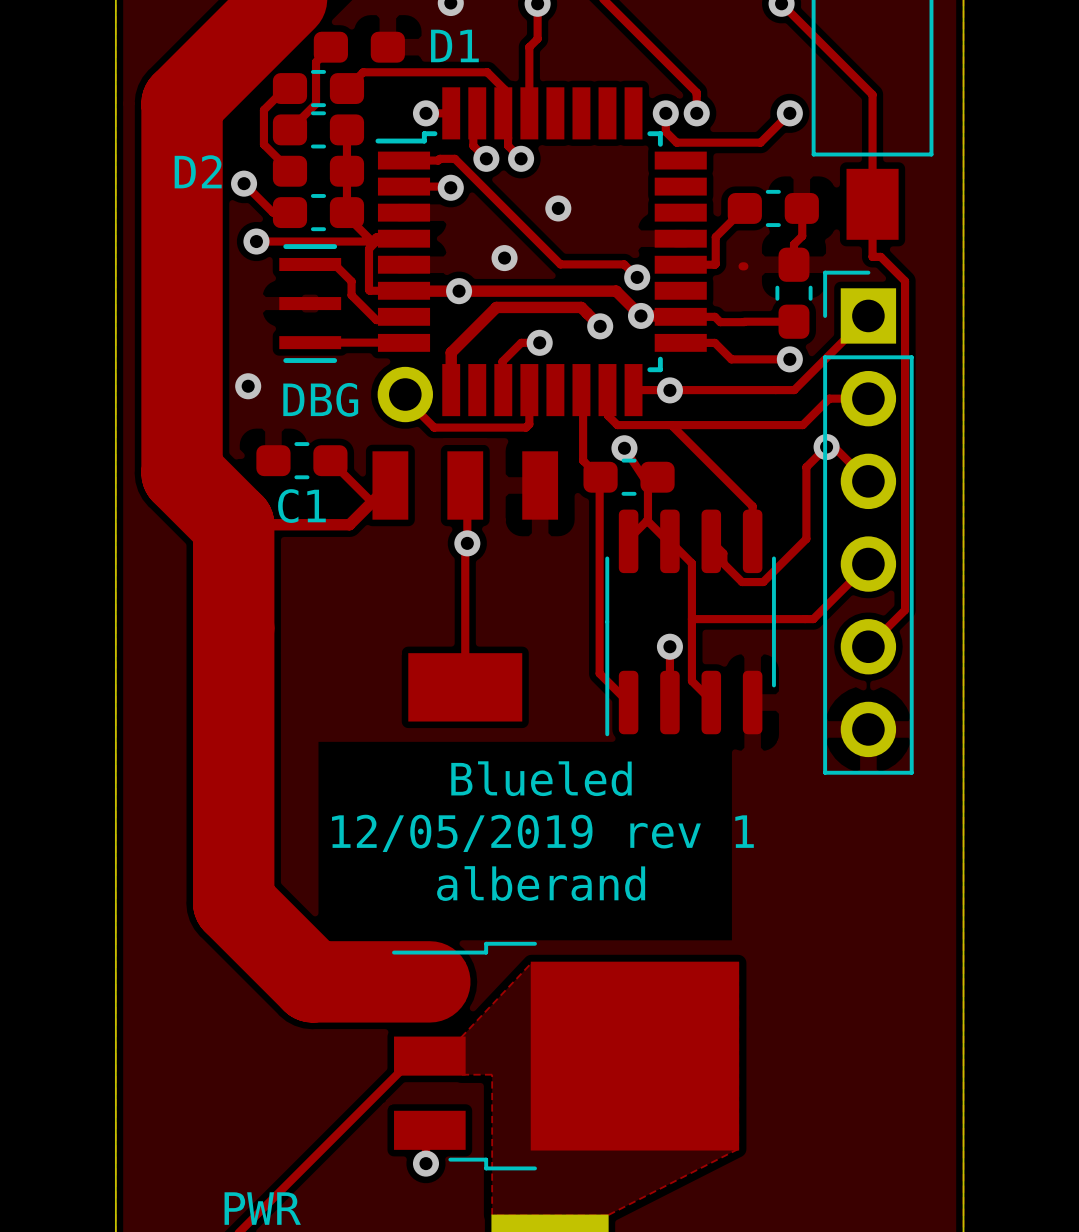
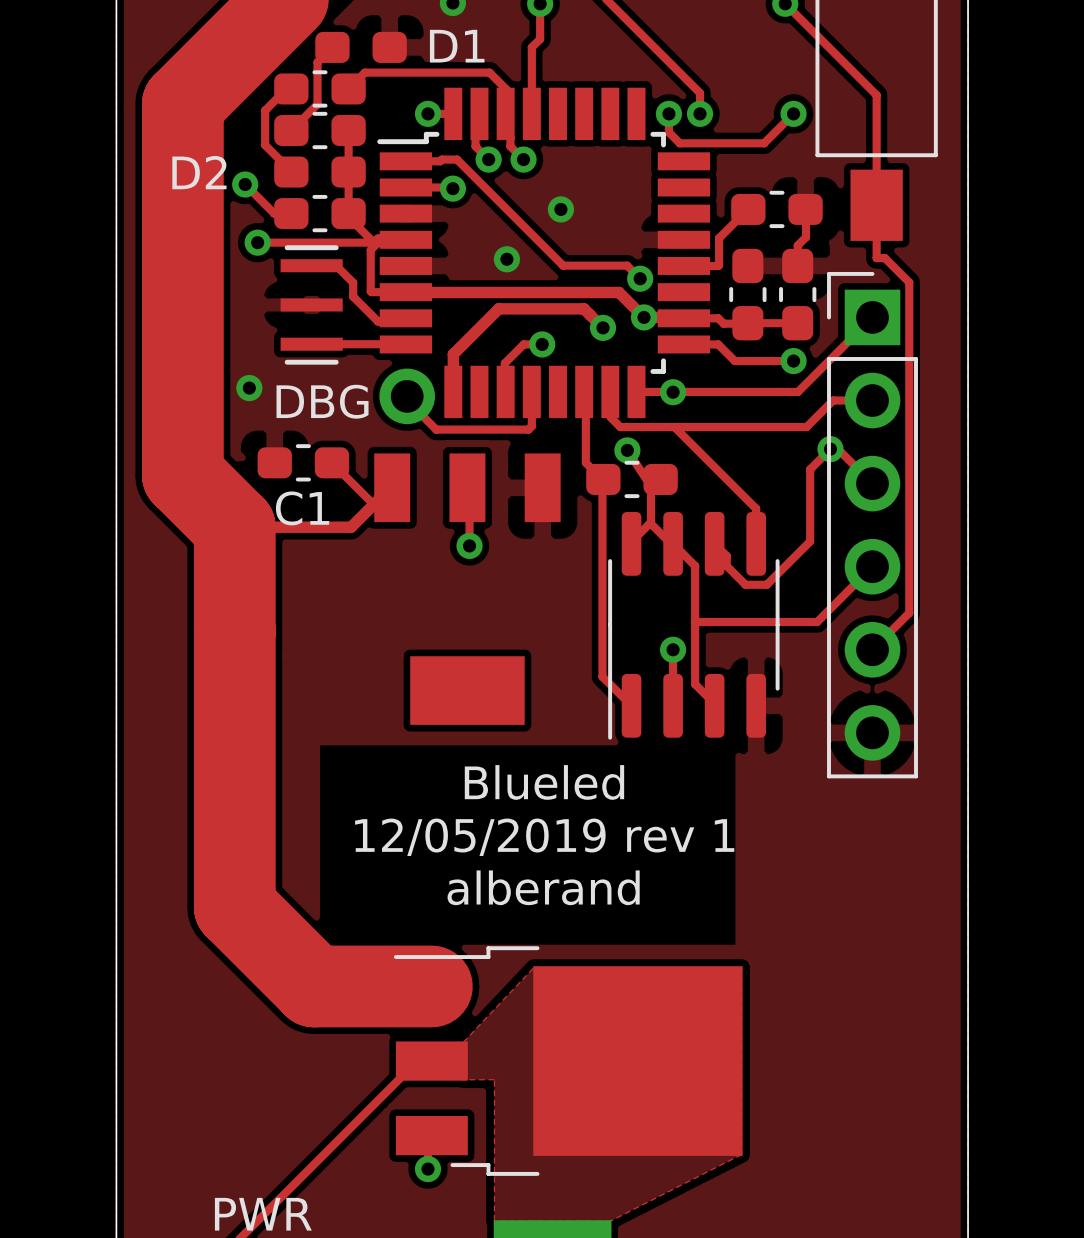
via: (459, 291) -> none
part: none -> (747, 294)
track: (467, 543) (465, 545) (465, 687) -> none

